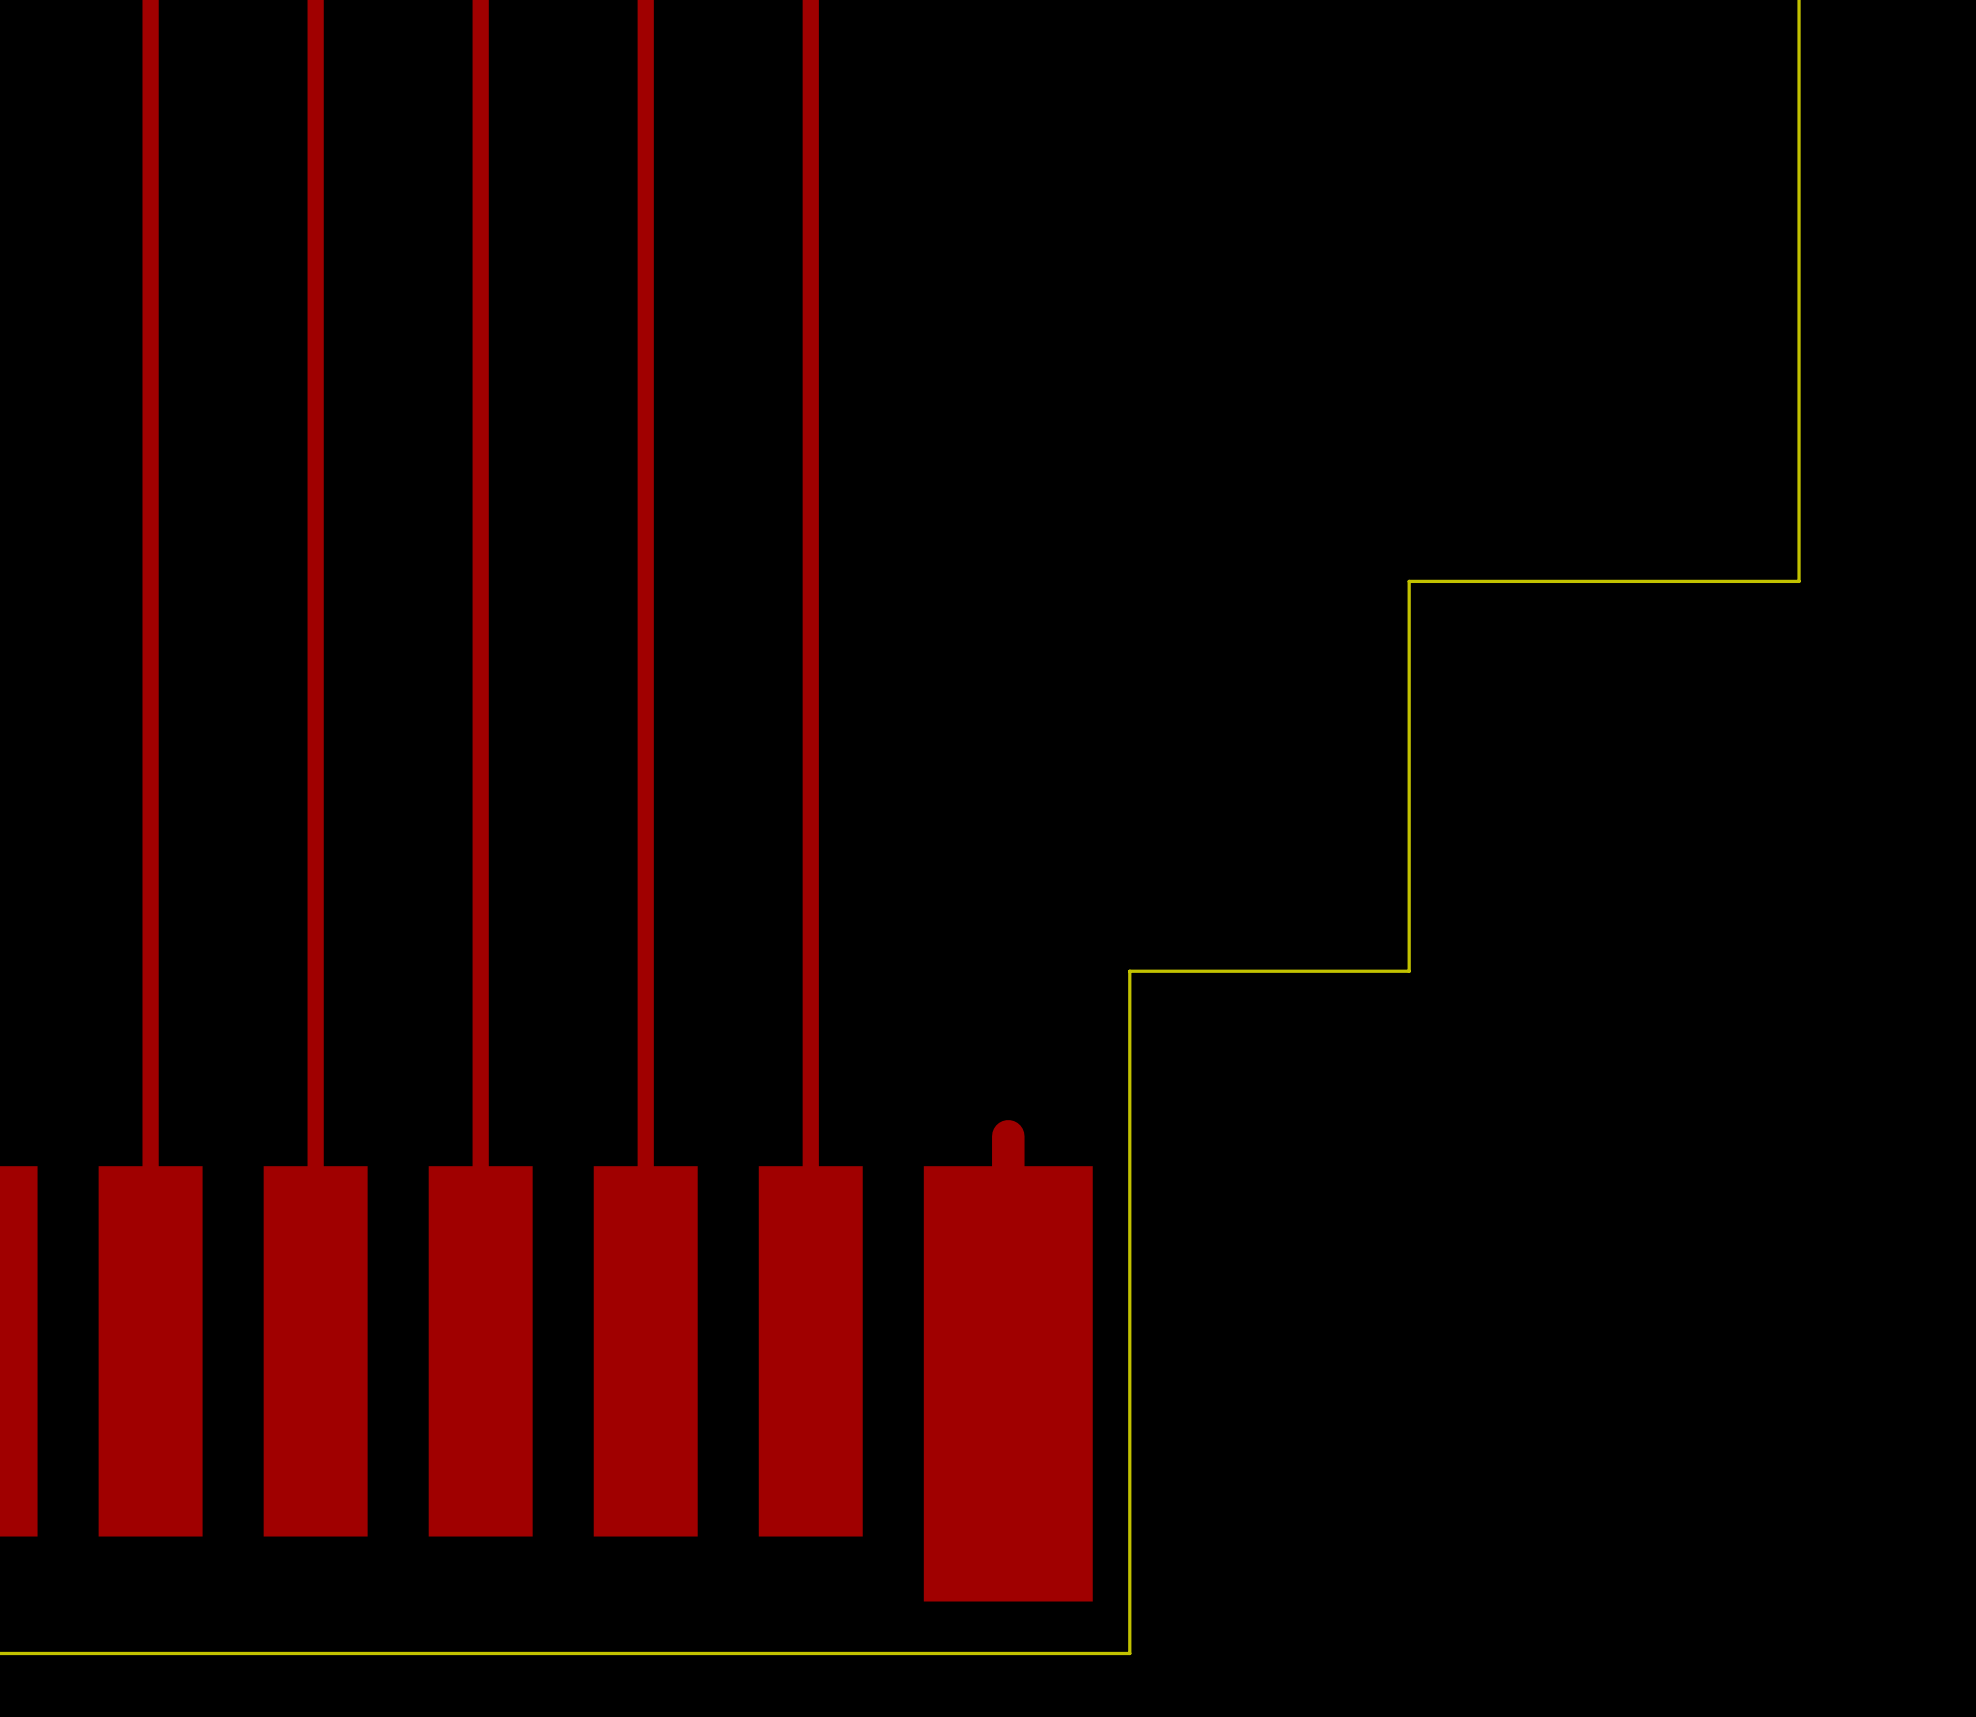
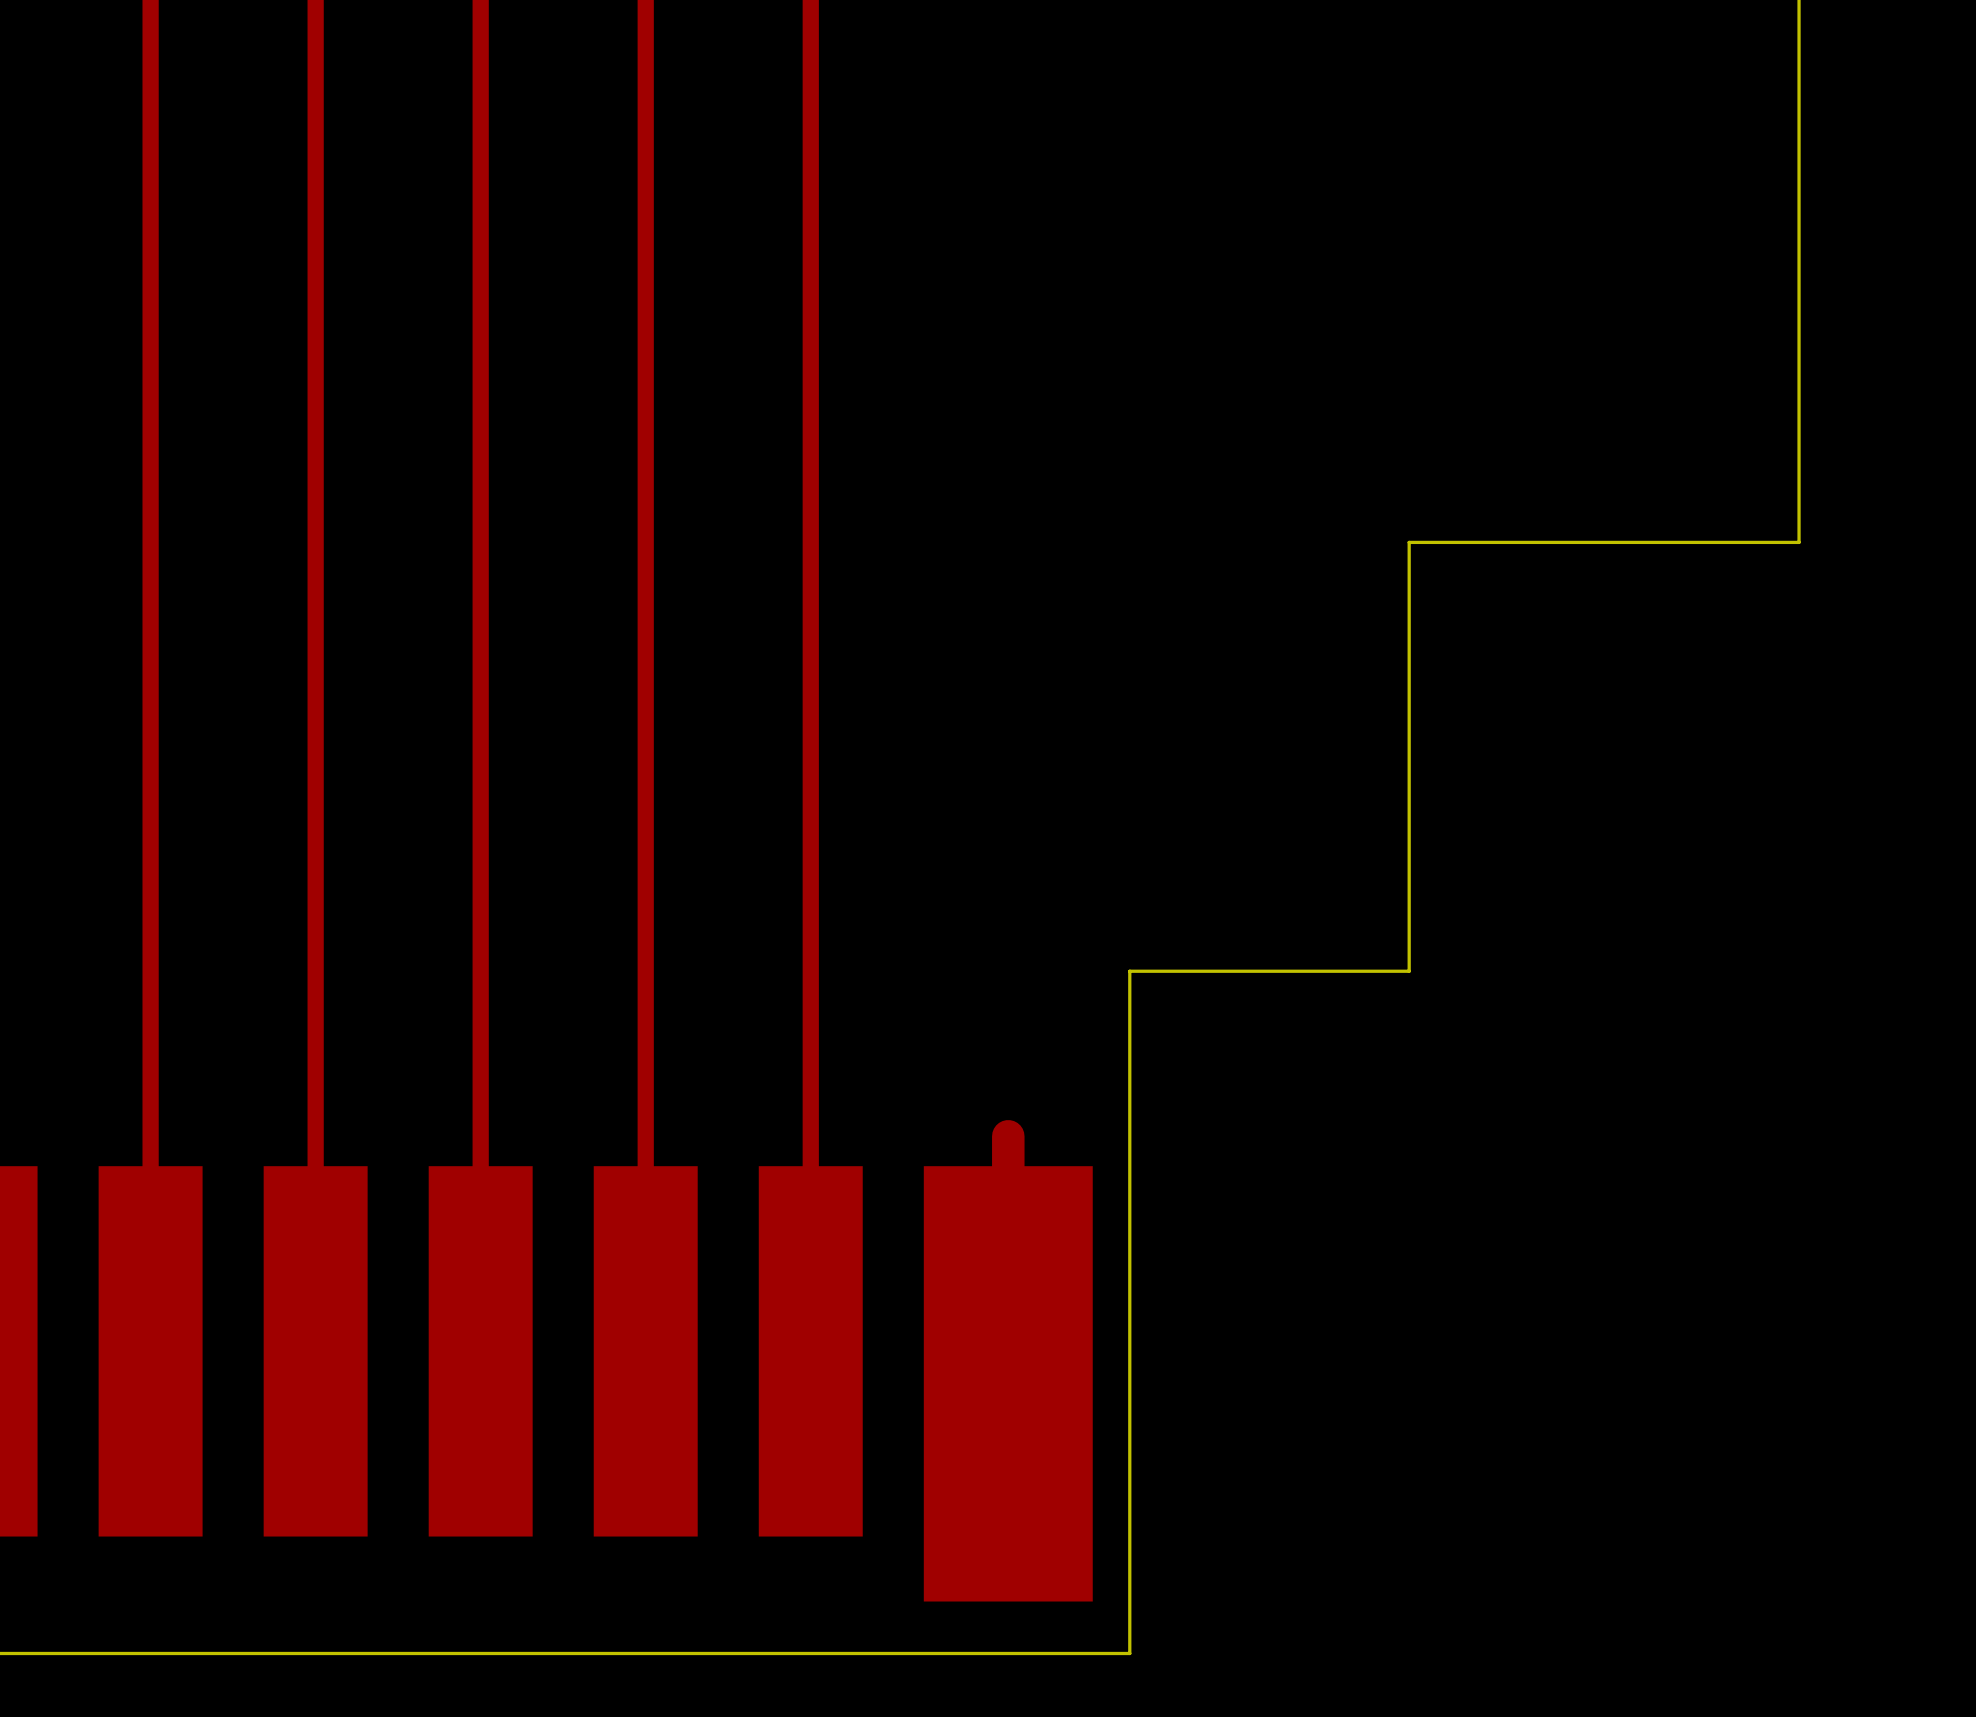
board edge: (1799, 542) (1799, 581) (1409, 581) -> (1799, 542) (1409, 542) (1409, 581)

